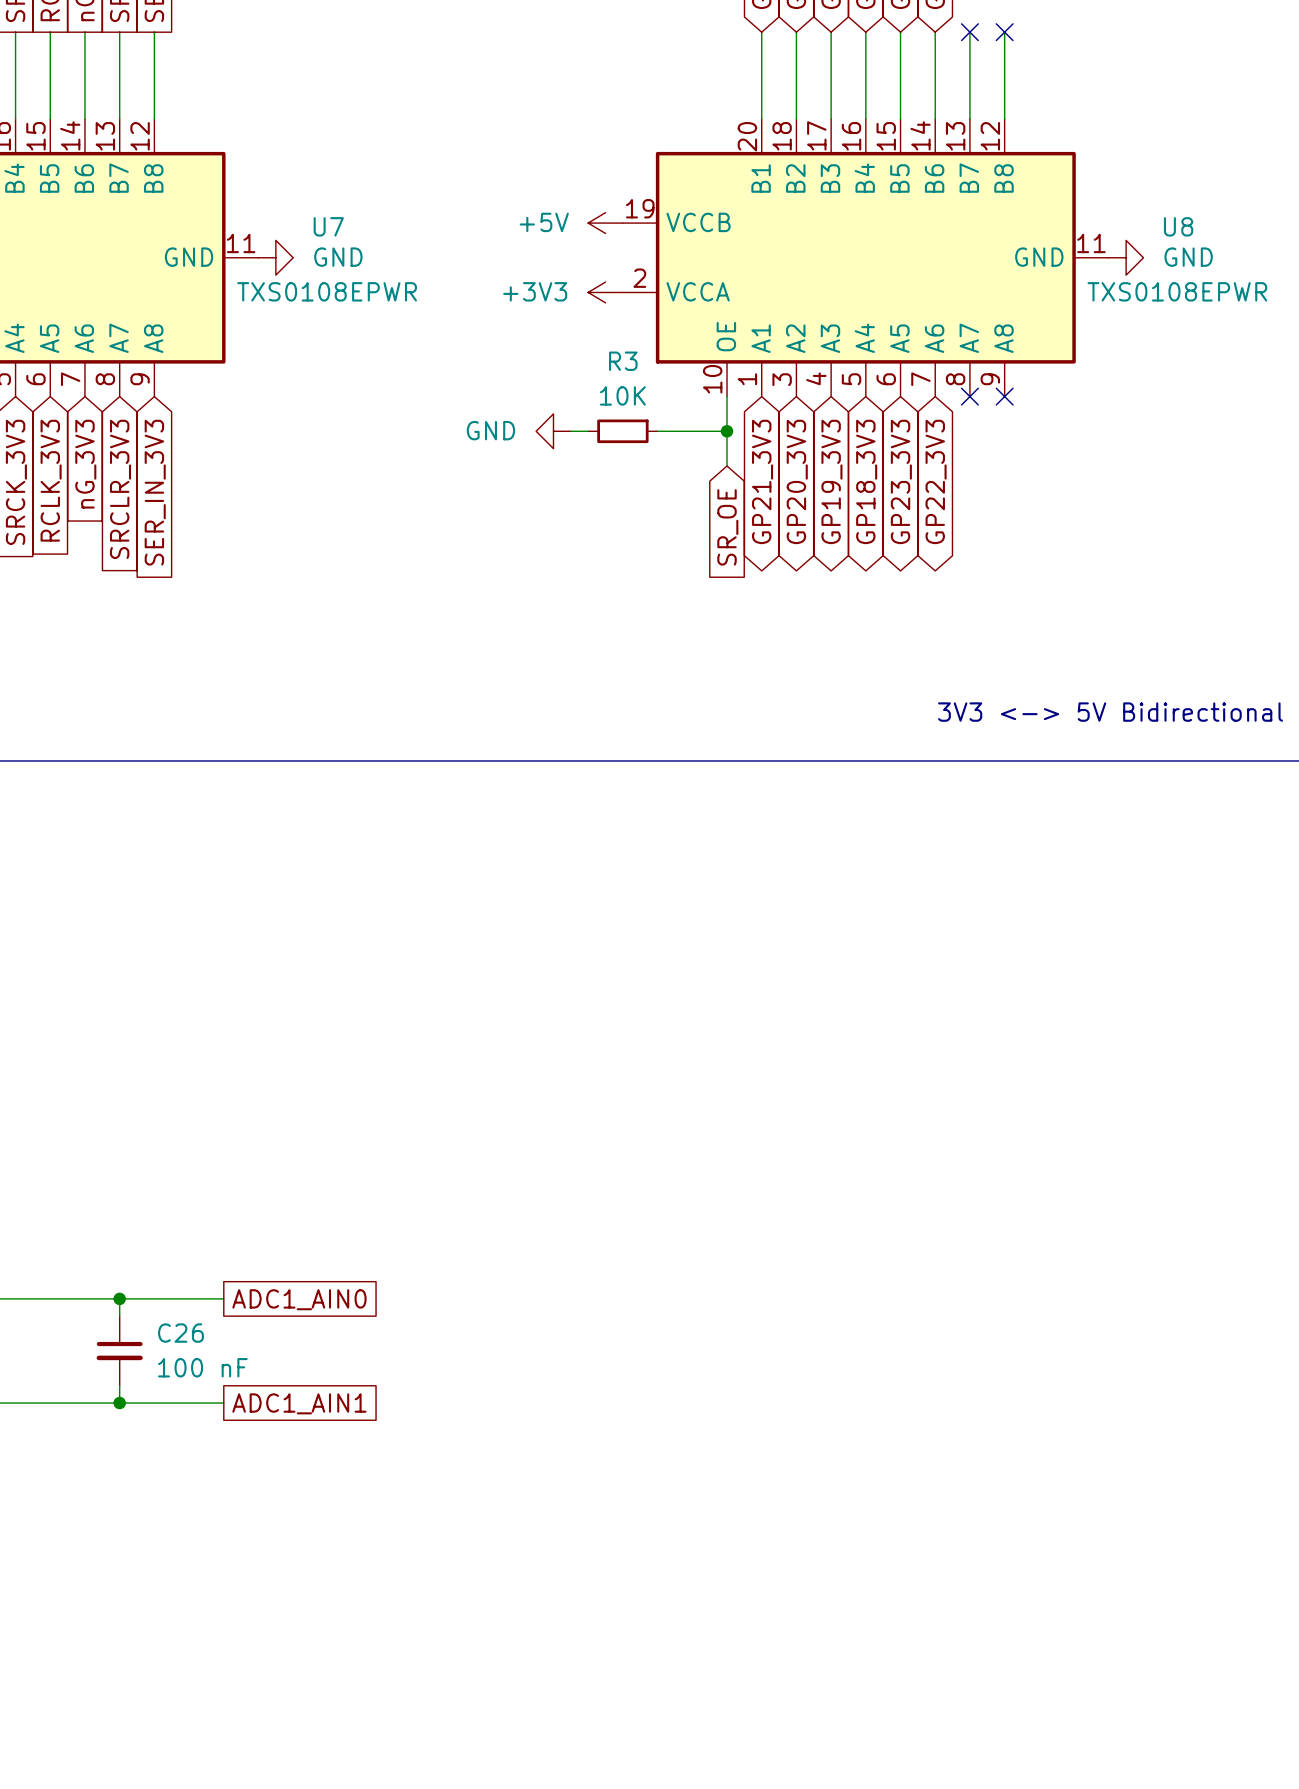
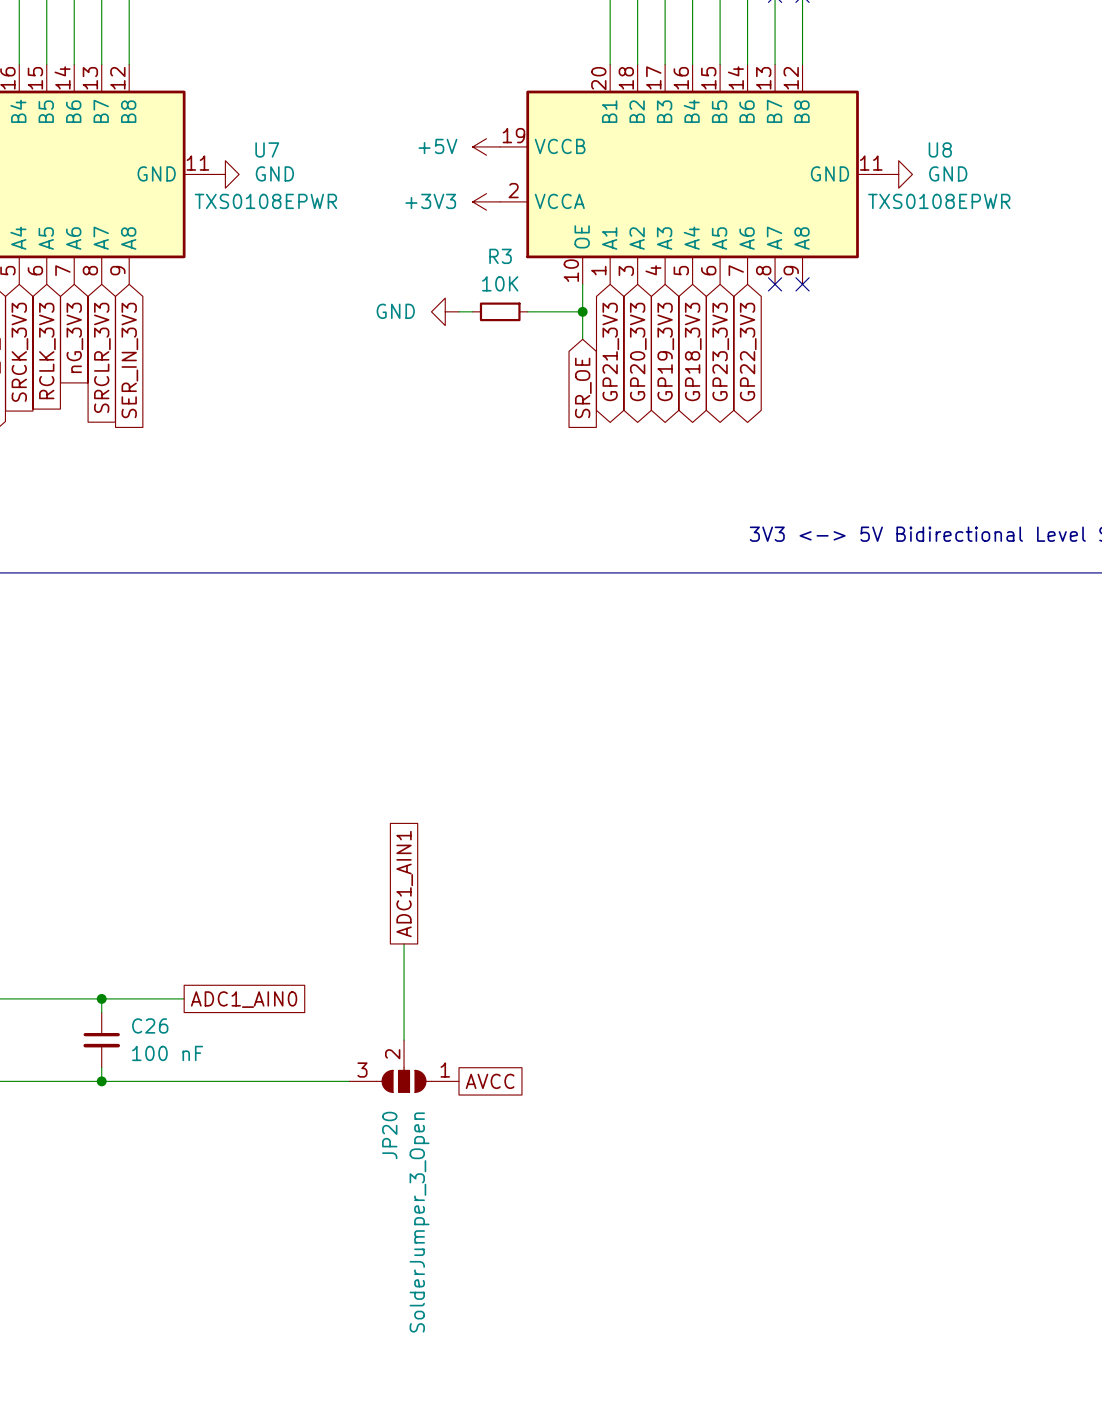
wire: none -> (404, 943) (404, 1040)
JP20: none -> SolderJumper_3_Open (404, 1066)
wire: none -> (184, 1081) (349, 1081)
global label rotation: 0° (299, 1403) -> 90° counterclockwise (404, 884)
global label position: ADC1_AIN1 (299, 1403) -> ADC1_AIN1 (404, 884)
global label: none -> AVCC (490, 1081)

